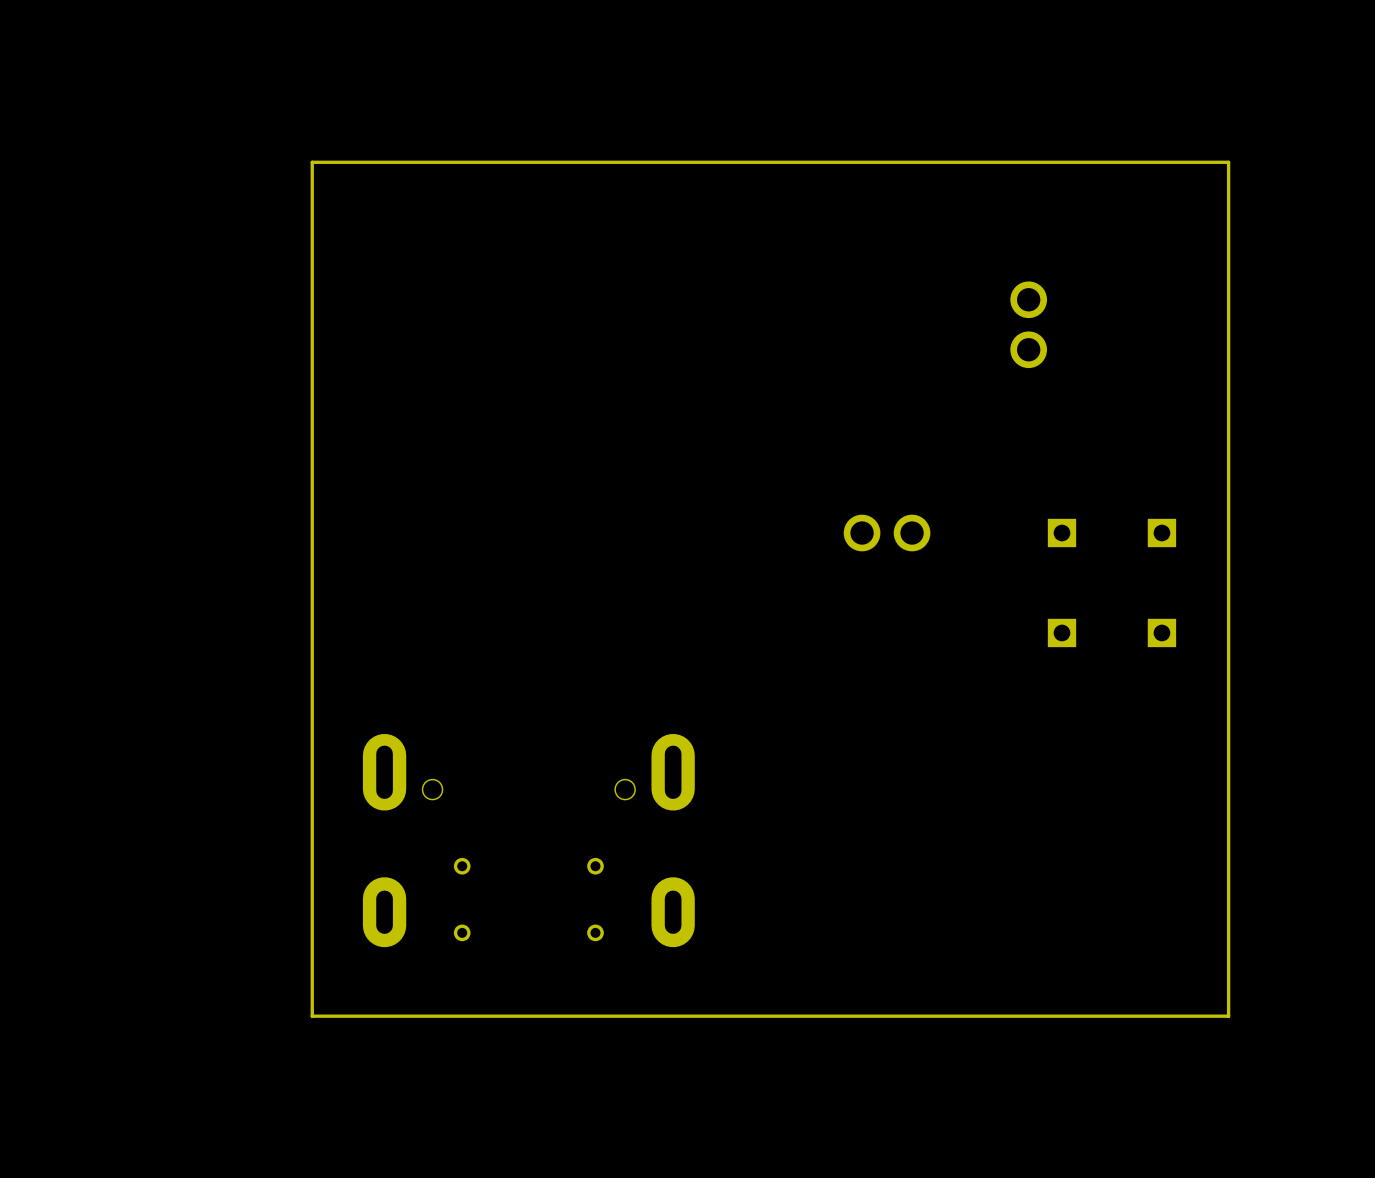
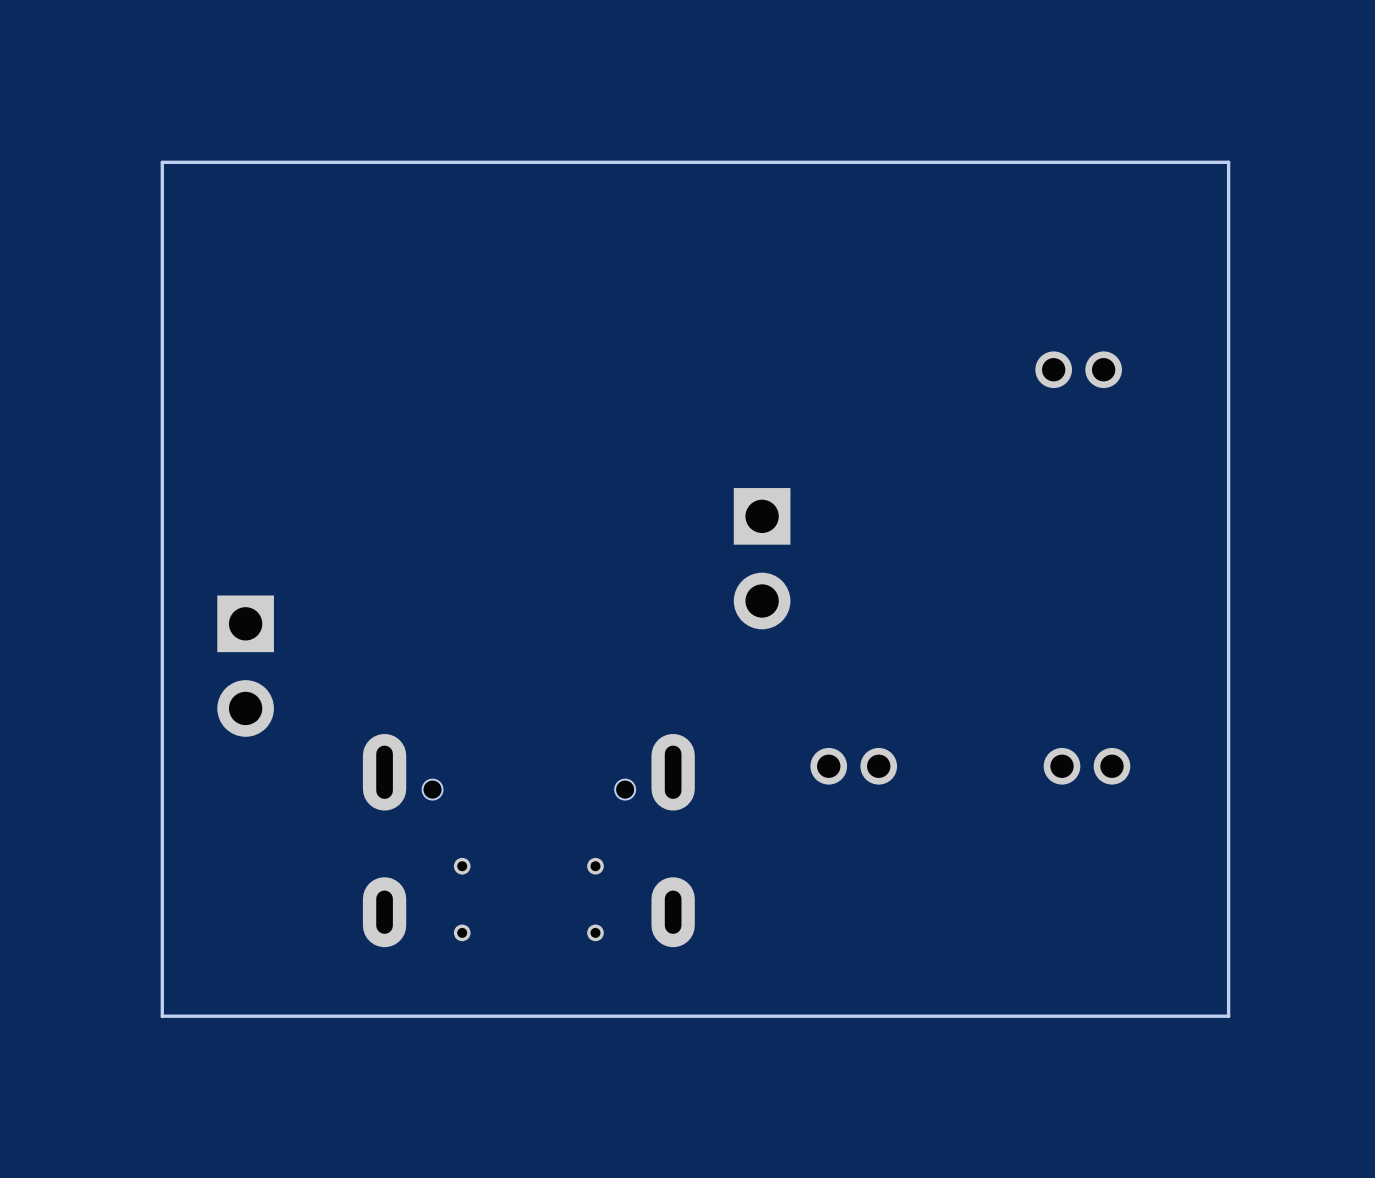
board edge: (312, 162) (312, 1016) -> (312, 162) (162, 162) (162, 1016) (312, 1016)
part rotation: 0° (1028, 324) -> 90° clockwise (1078, 369)
part position: (1028, 324) -> (1078, 369)
part: (887, 533) -> none
part: (1062, 533) -> none
part: (1161, 533) -> none
part: none -> (762, 558)
part: (1062, 632) -> none
part: (1161, 632) -> none
part: none -> (245, 666)
part: none -> (853, 766)
part: none -> (1086, 766)

